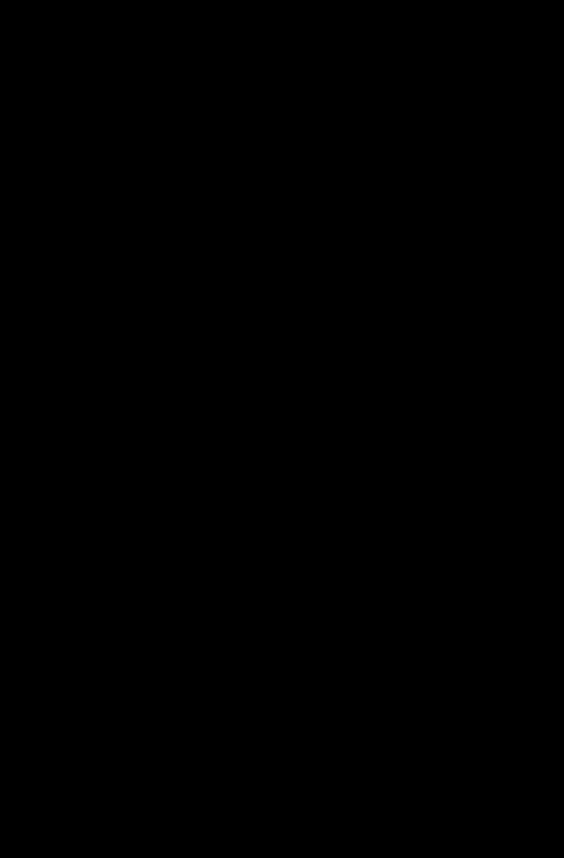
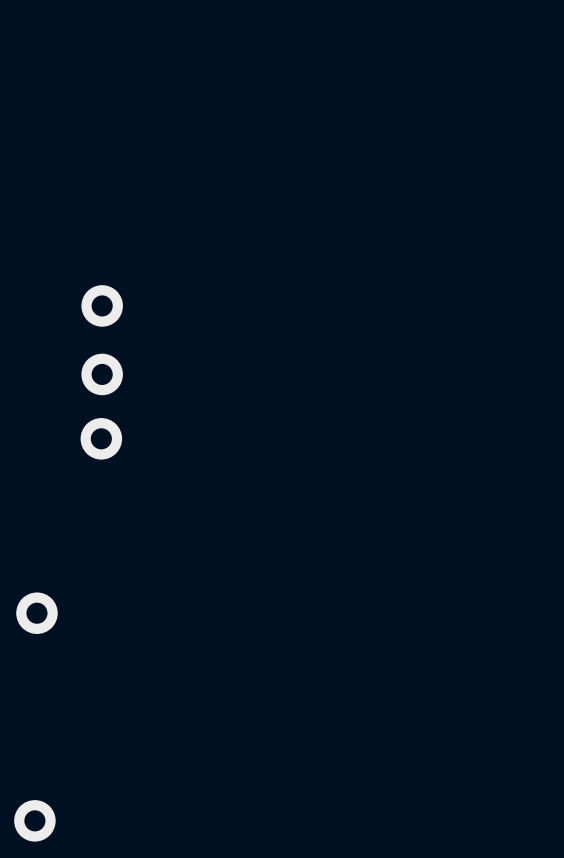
via: none -> (102, 305)
via: none -> (102, 374)
via: none -> (101, 438)
via: none -> (36, 613)
via: none -> (34, 820)

